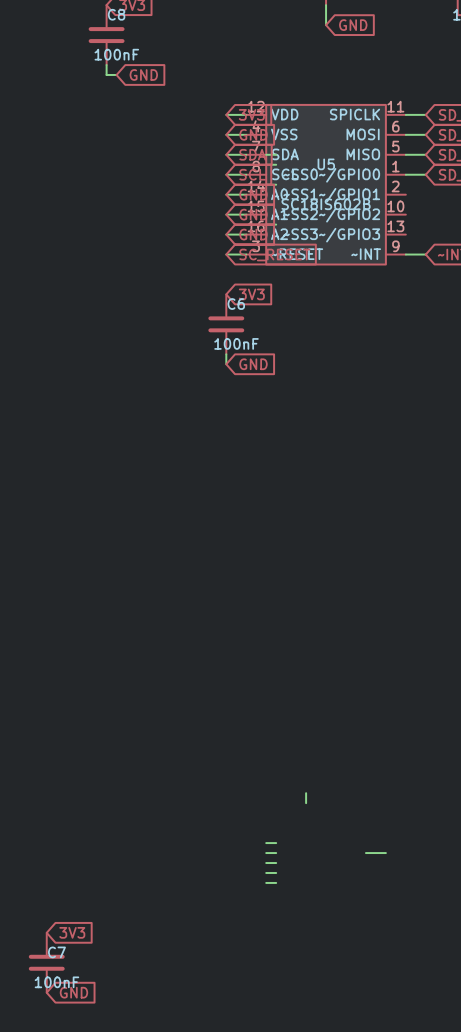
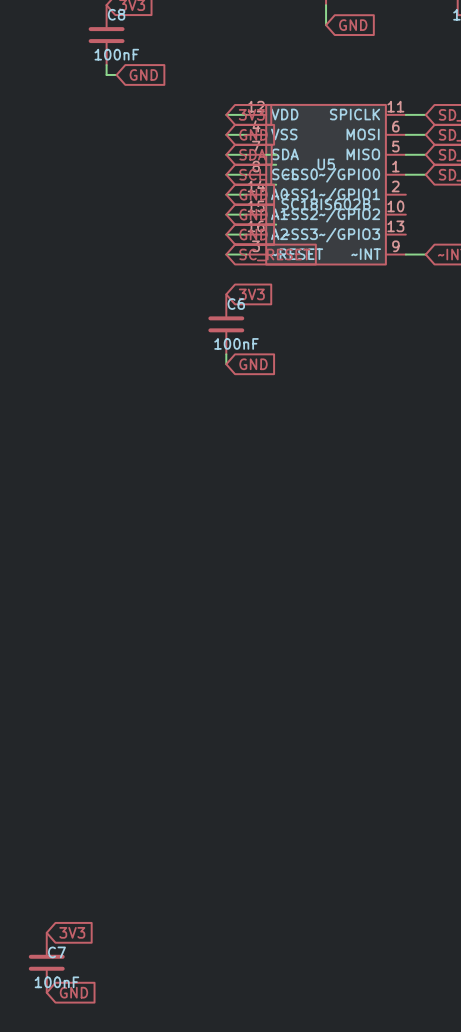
wire: (306, 793) (306, 803) -> none
wire: (266, 843) (276, 843) -> none
wire: (266, 853) (276, 853) -> none
wire: (365, 853) (385, 853) -> none
wire: (266, 863) (276, 863) -> none
wire: (266, 872) (276, 872) -> none
wire: (266, 882) (276, 882) -> none

